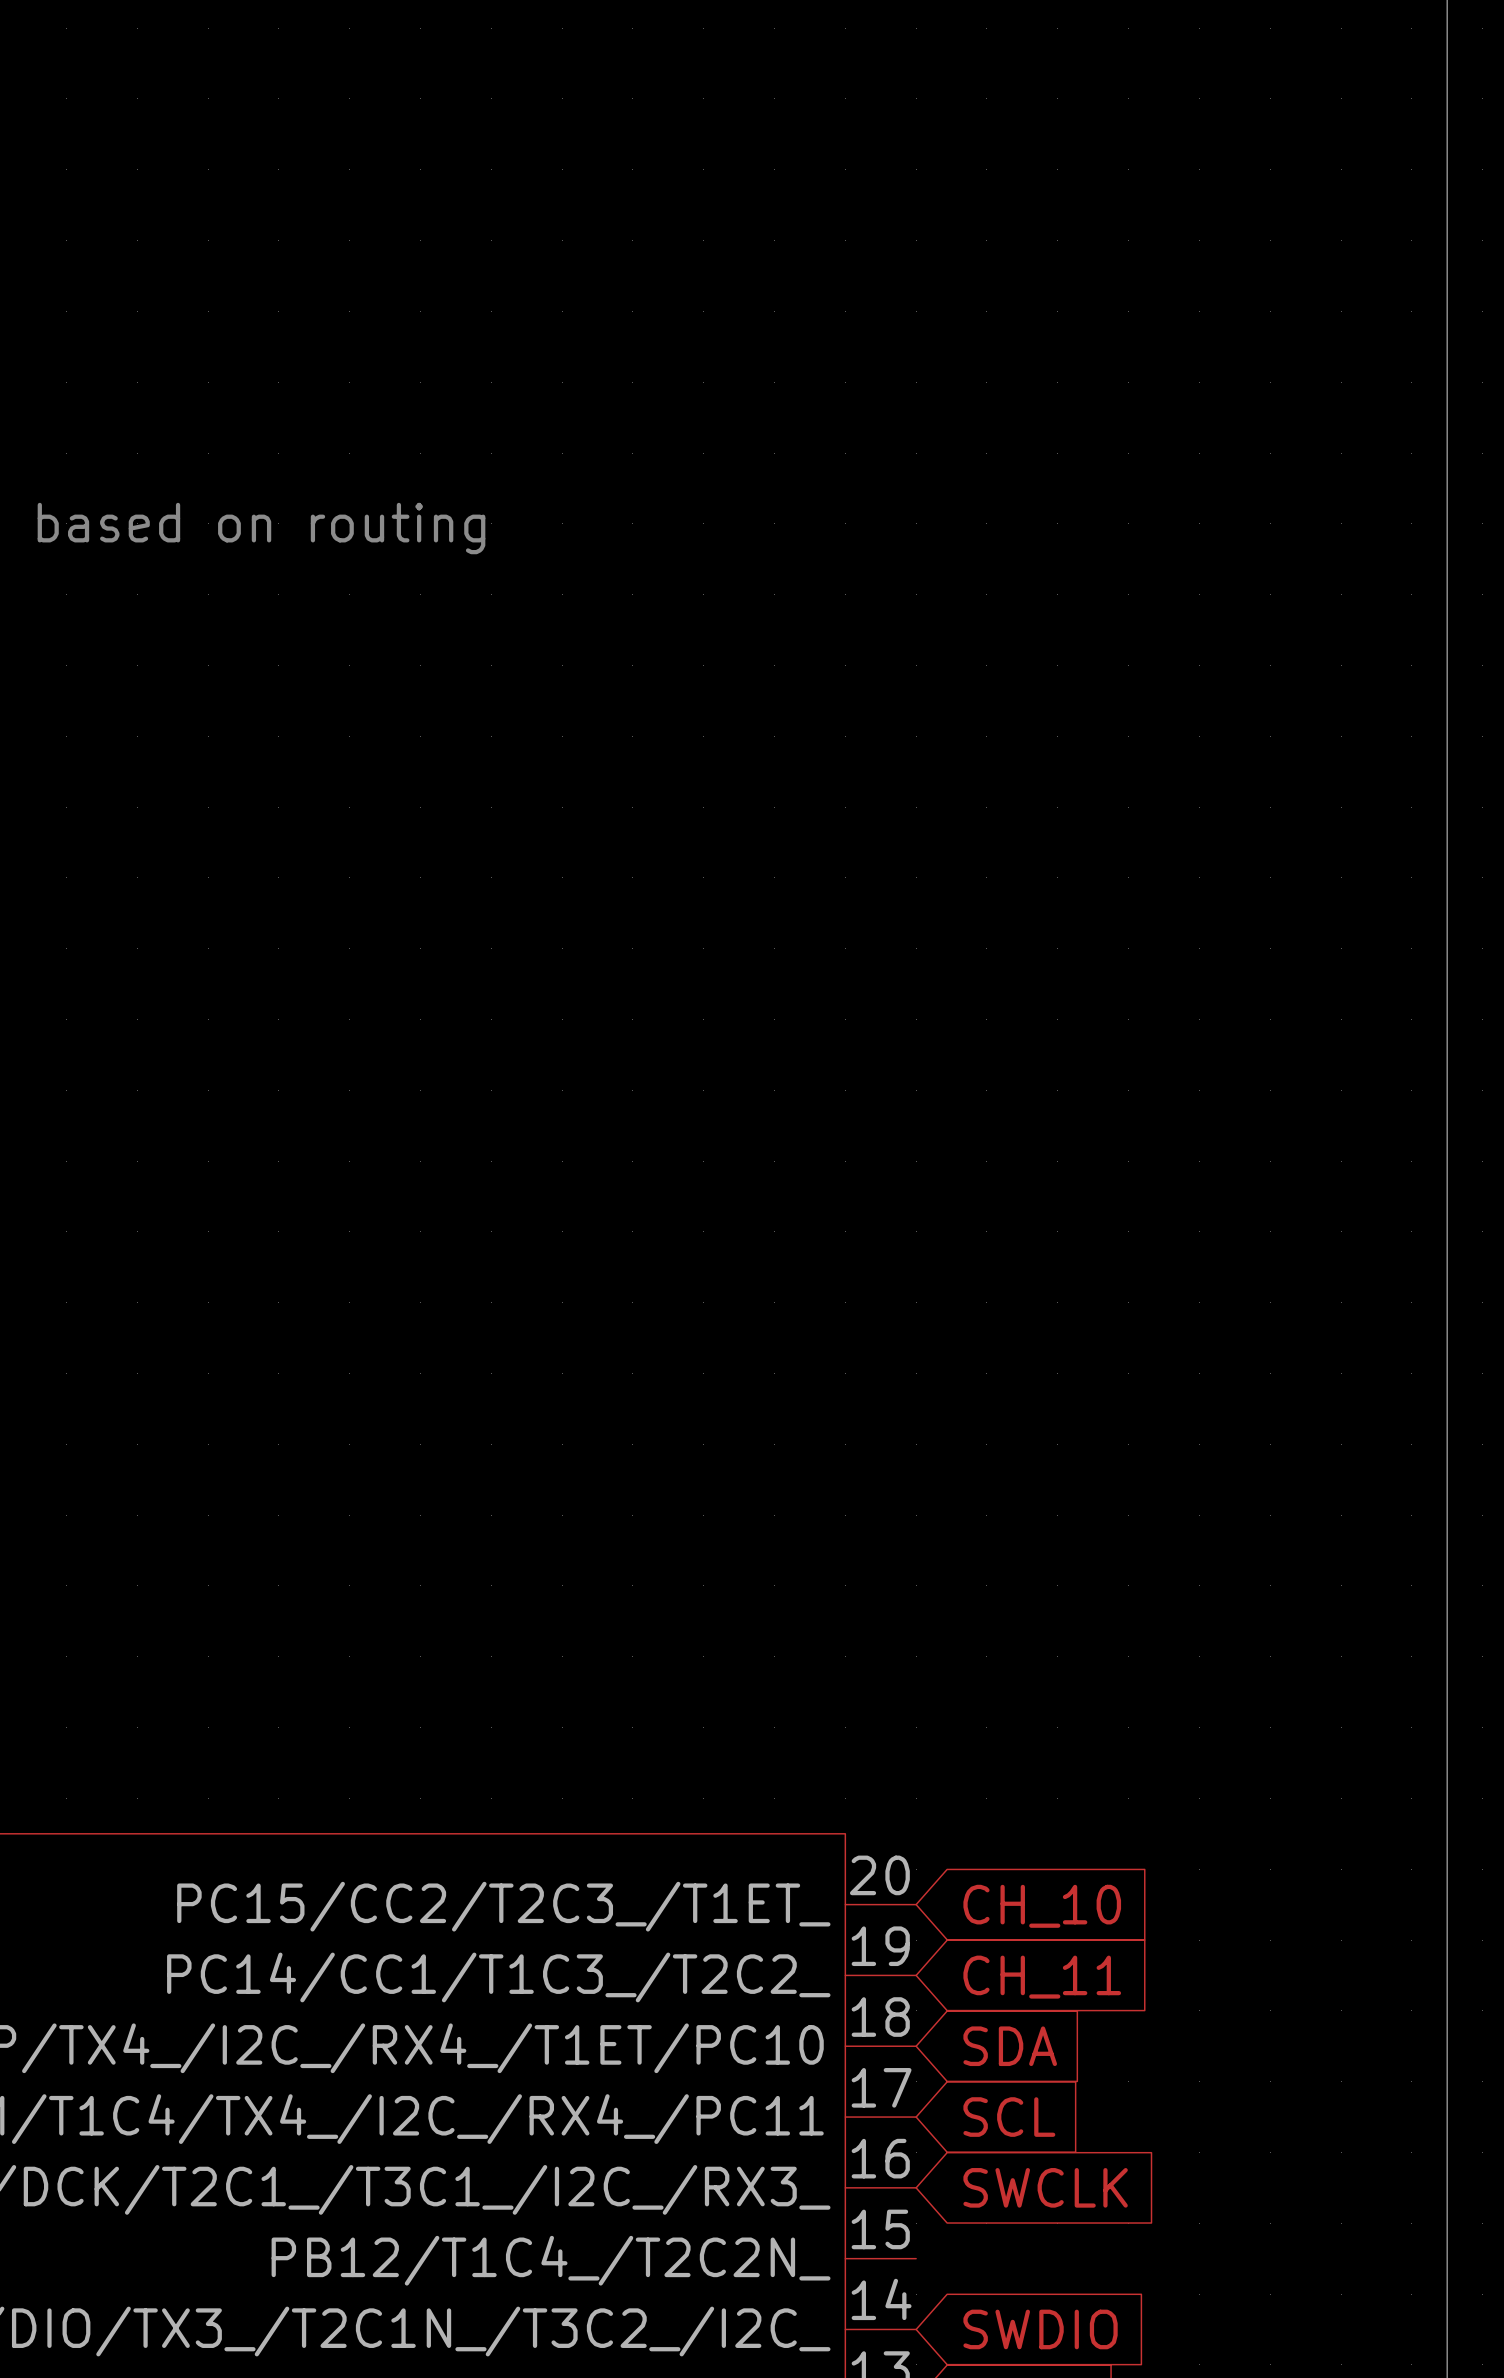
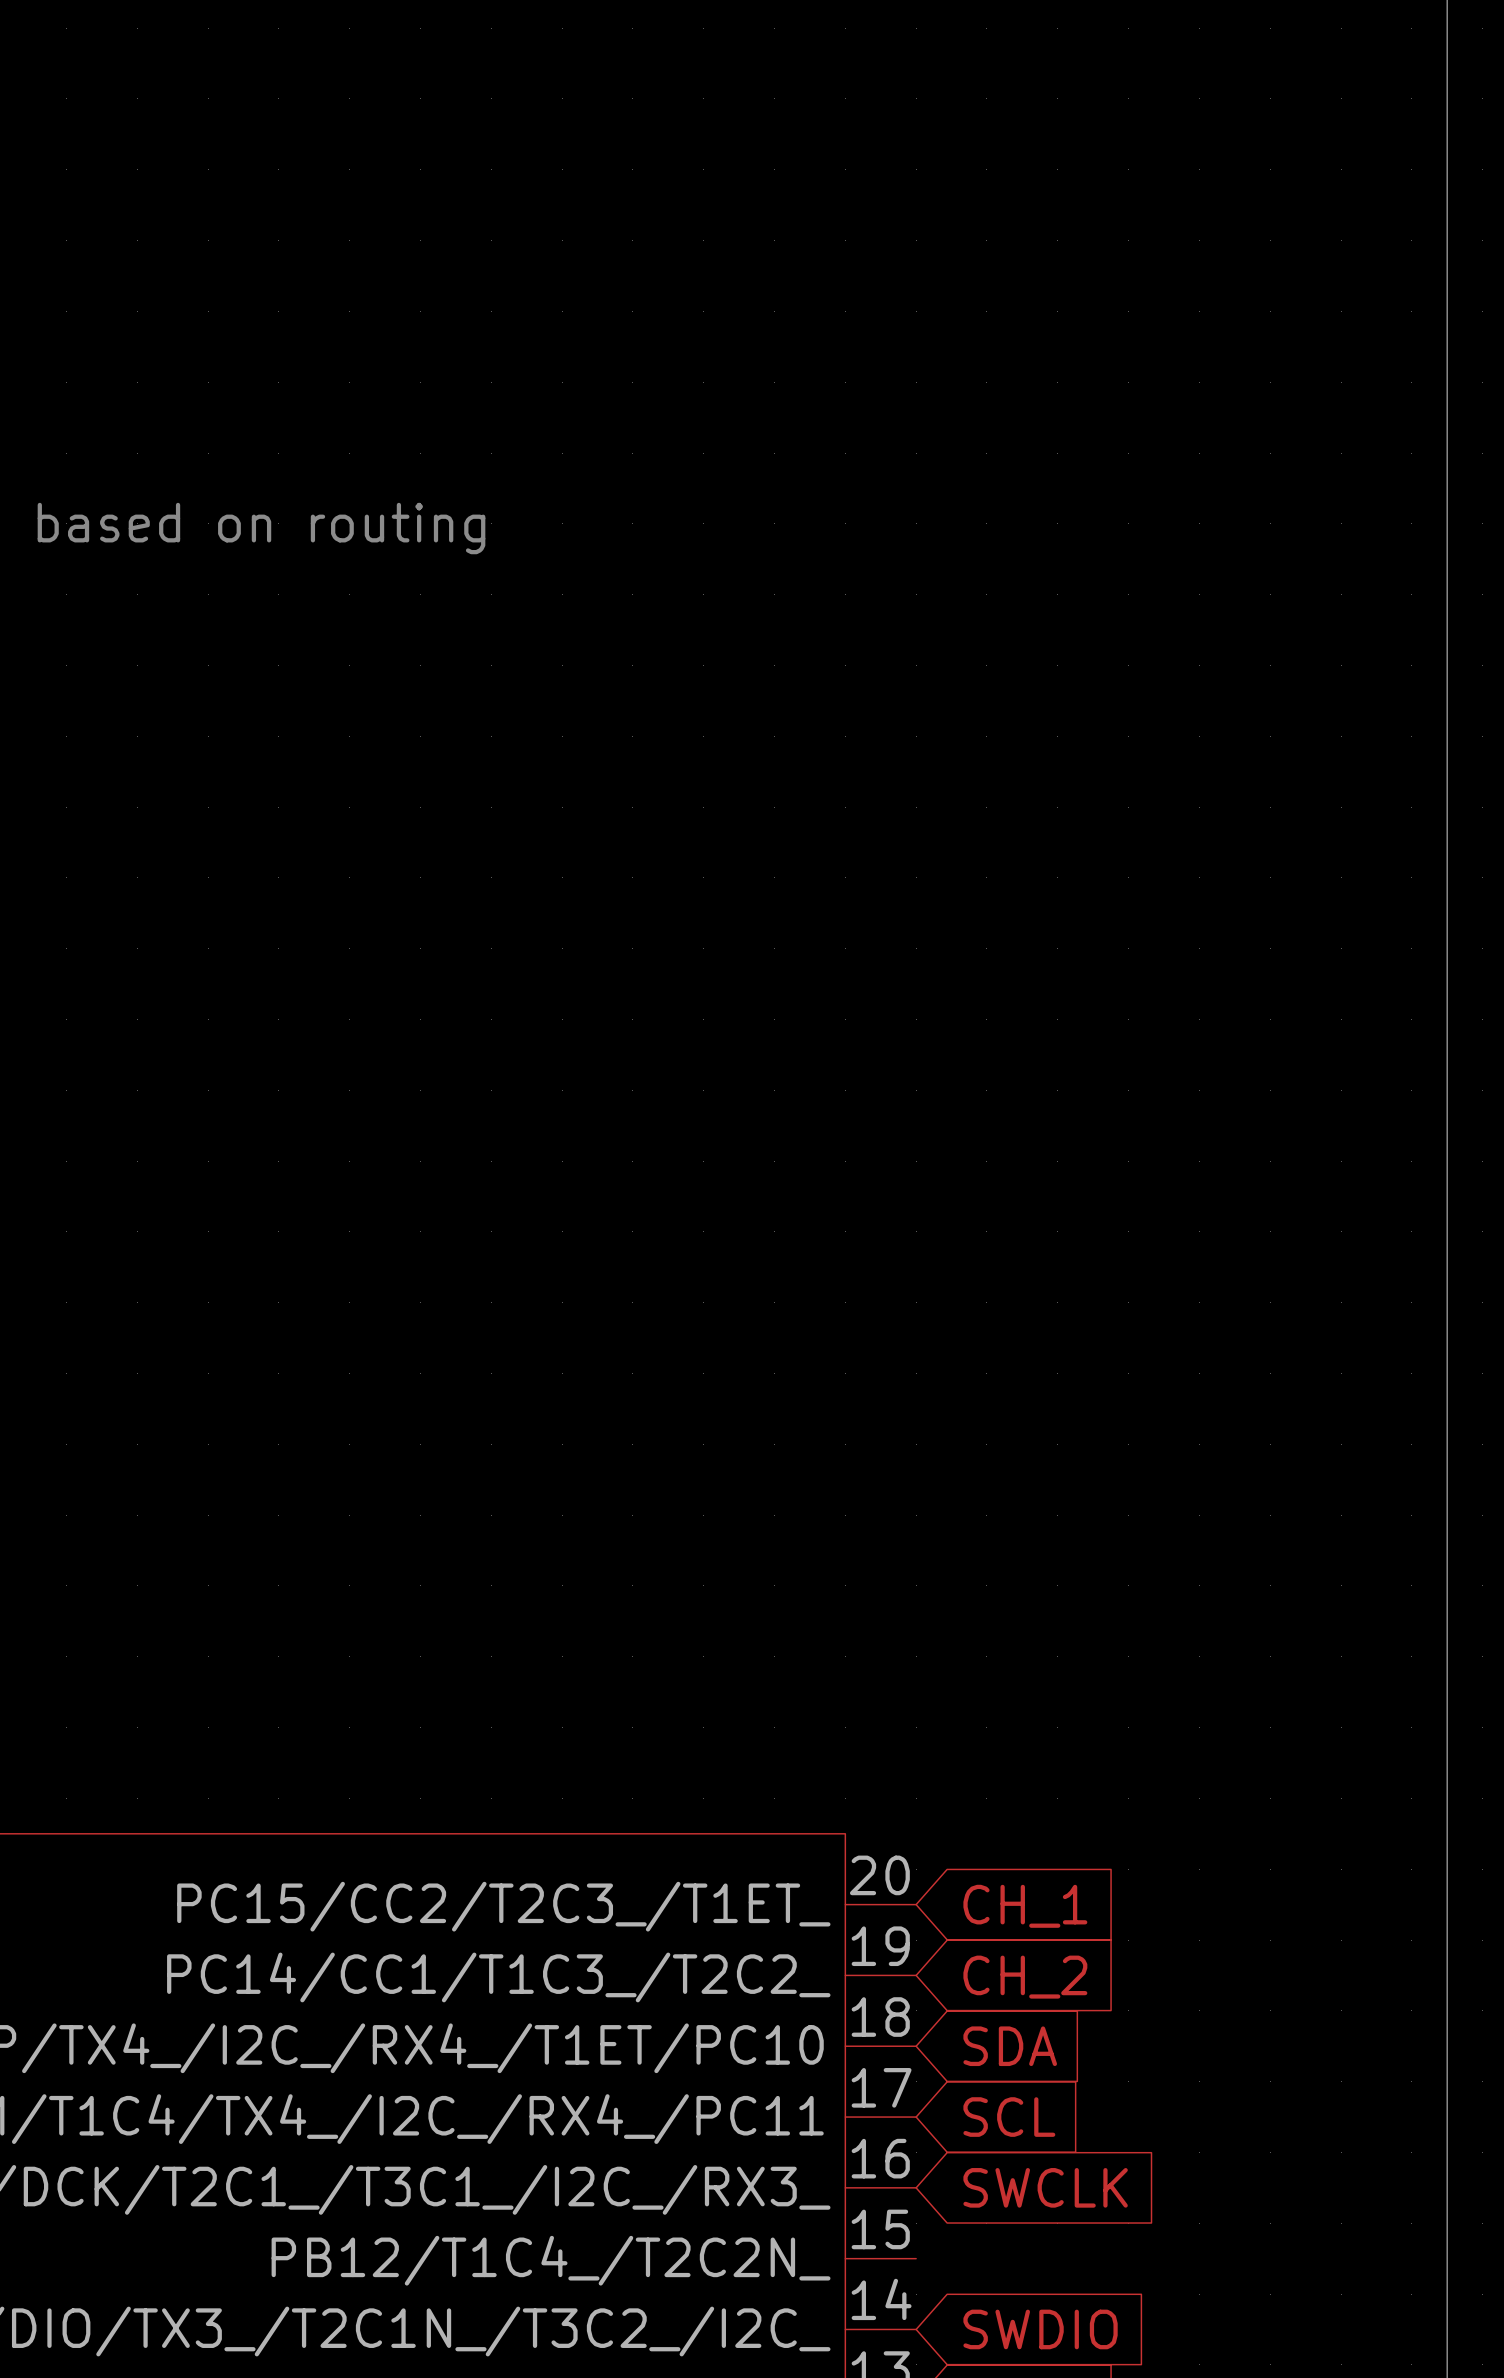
global label: CH_10 (1042, 1906) -> CH_1 (1025, 1906)
global label: CH_11 (1042, 1977) -> CH_2 (1025, 1977)

